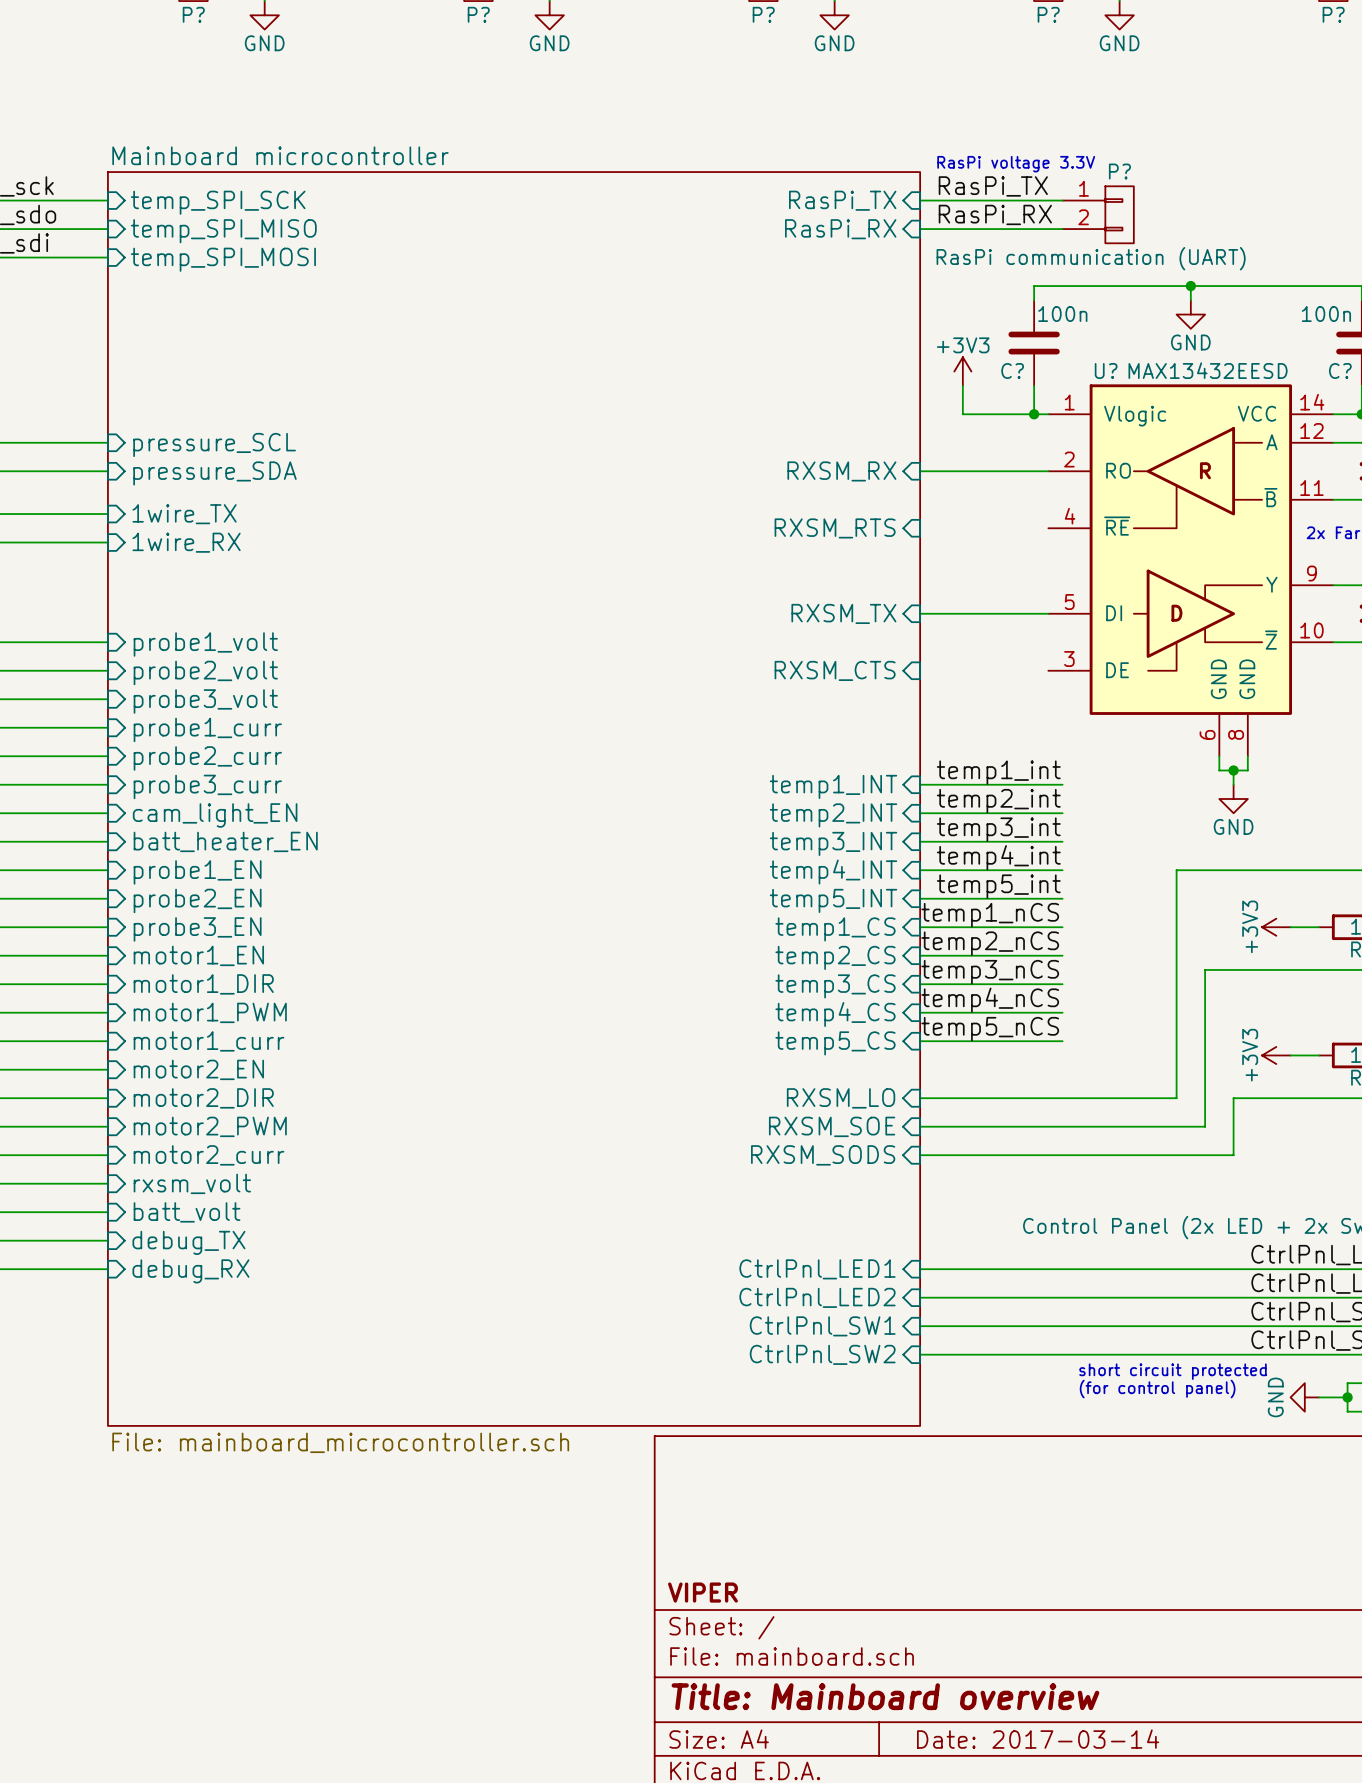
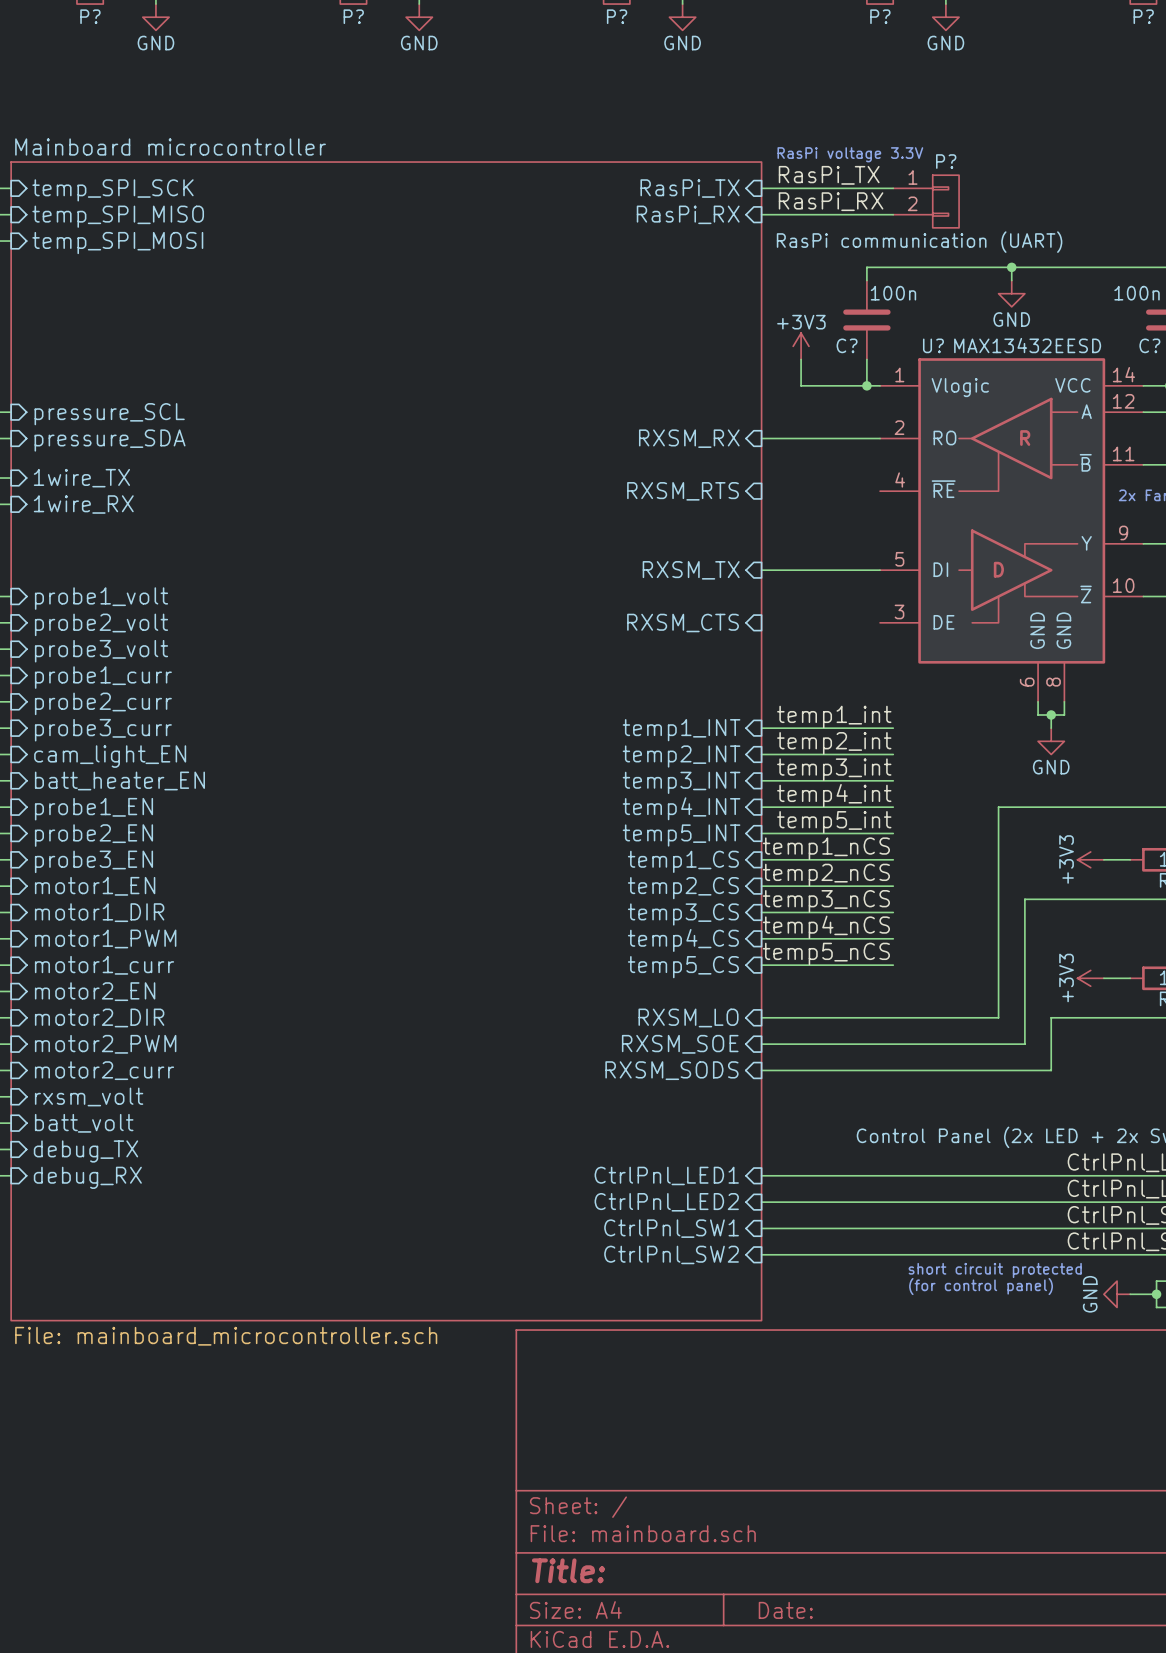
title block: VIPER (702, 1592) -> none
title block: Title: Mainboard overview (885, 1696) -> Title: (568, 1570)
title block: Date: 2017-03-14 (1038, 1739) -> Date: (785, 1610)

